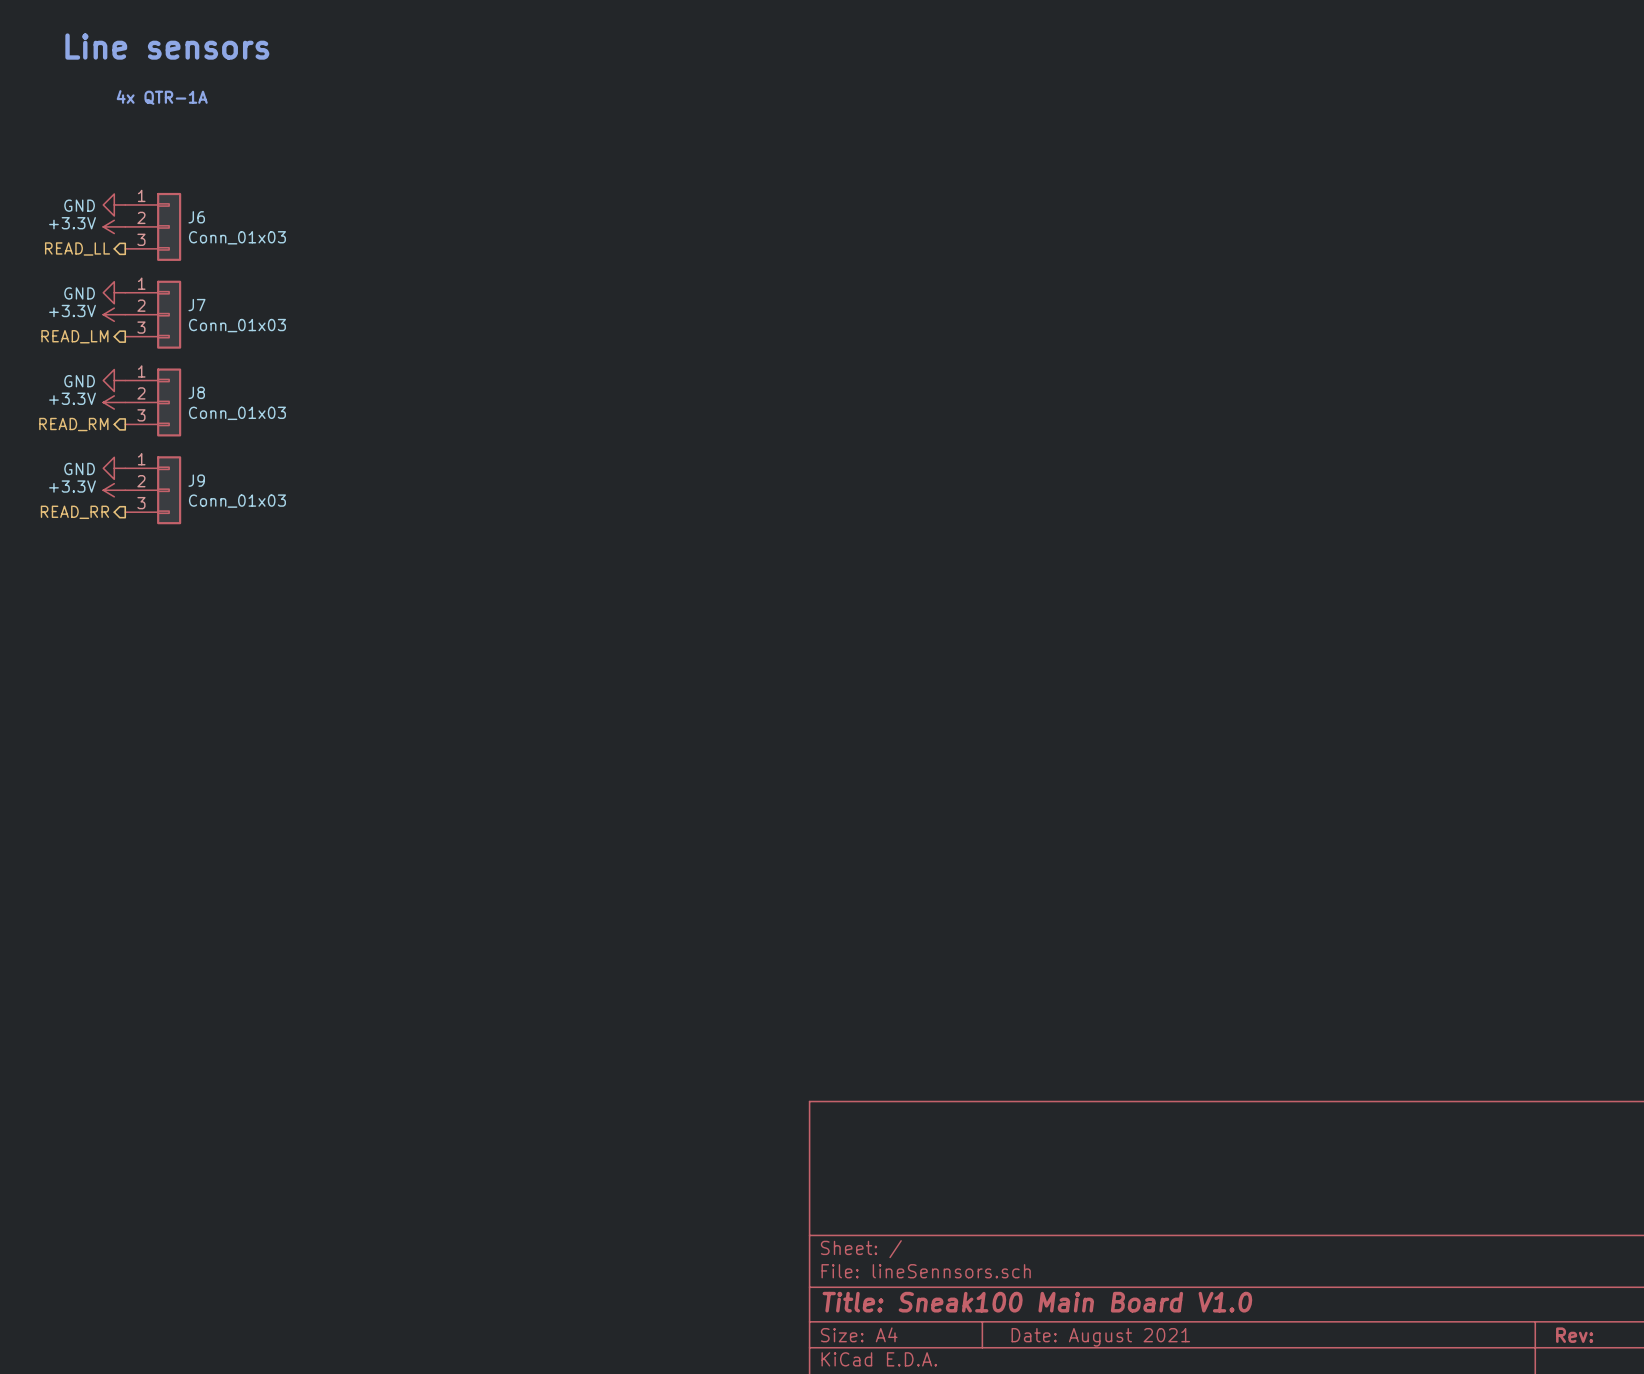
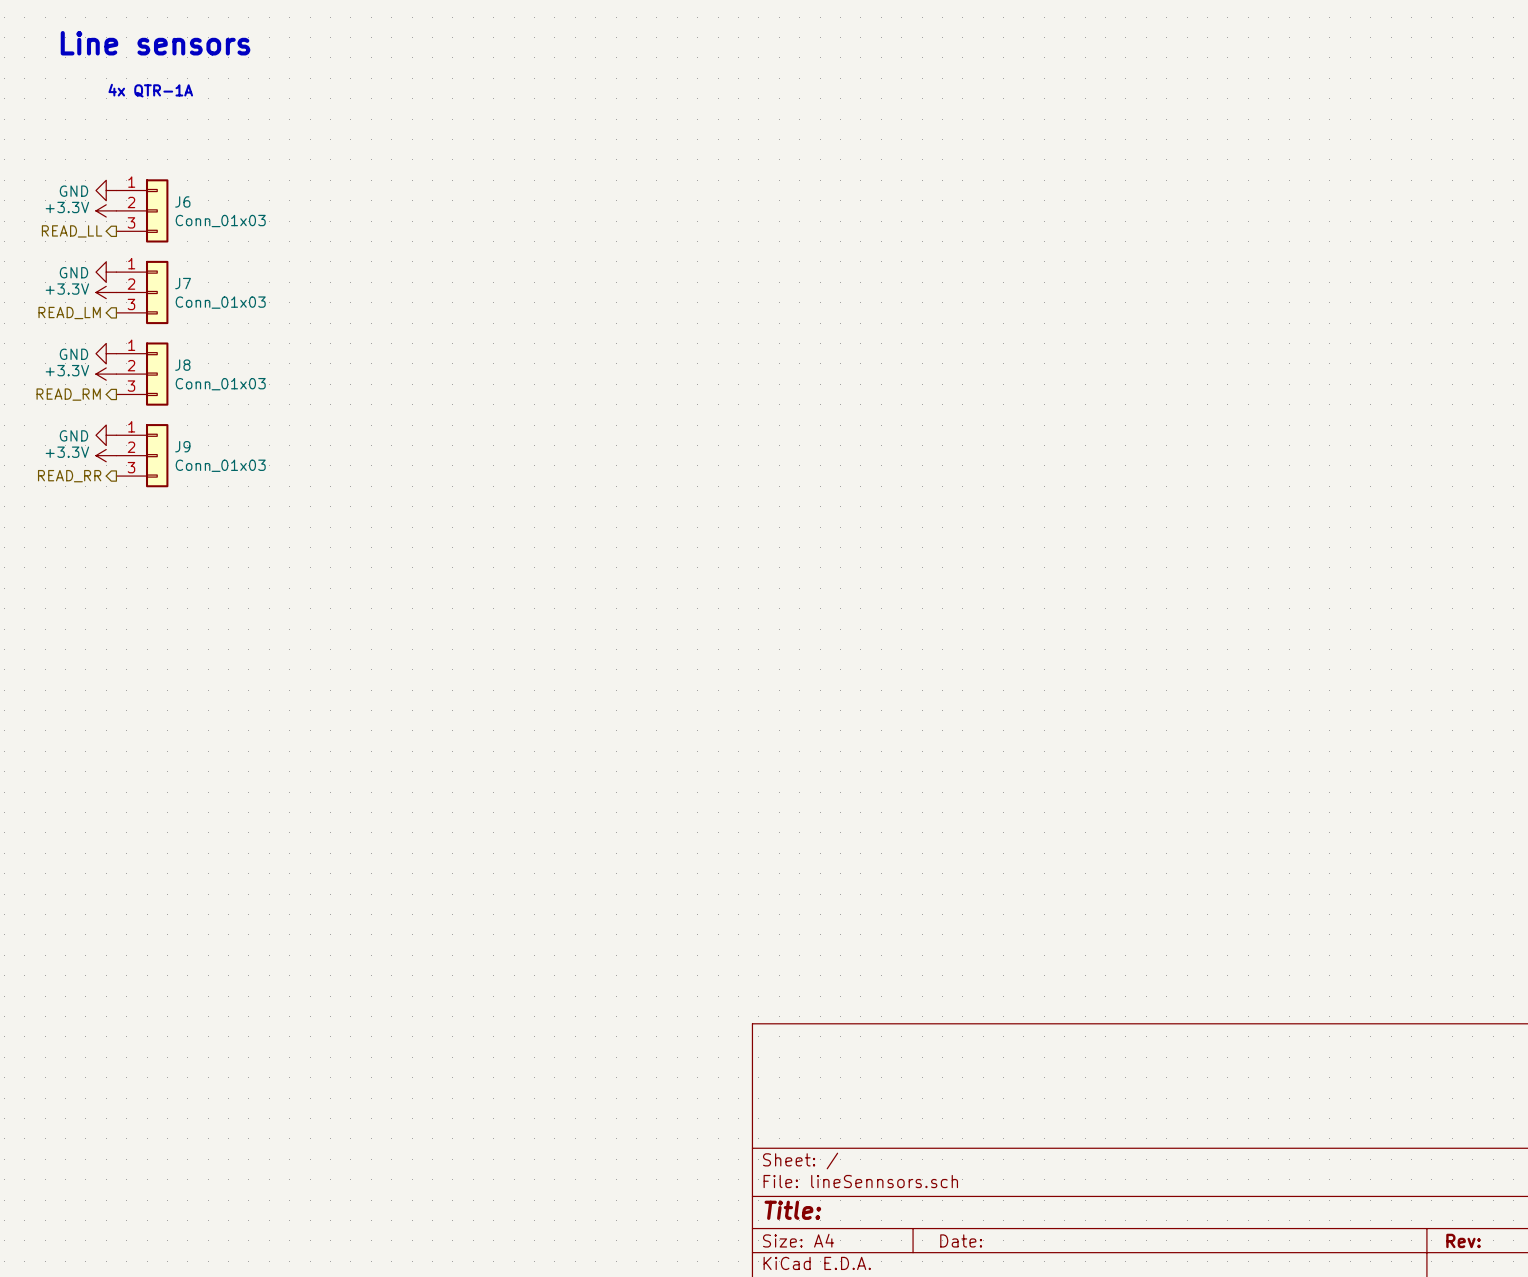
title block: Title: Sneak100 Main Board V1.0 (1037, 1302) -> Title: (792, 1210)
title block: Date: August 2021 (1100, 1337) -> Date: (961, 1240)

